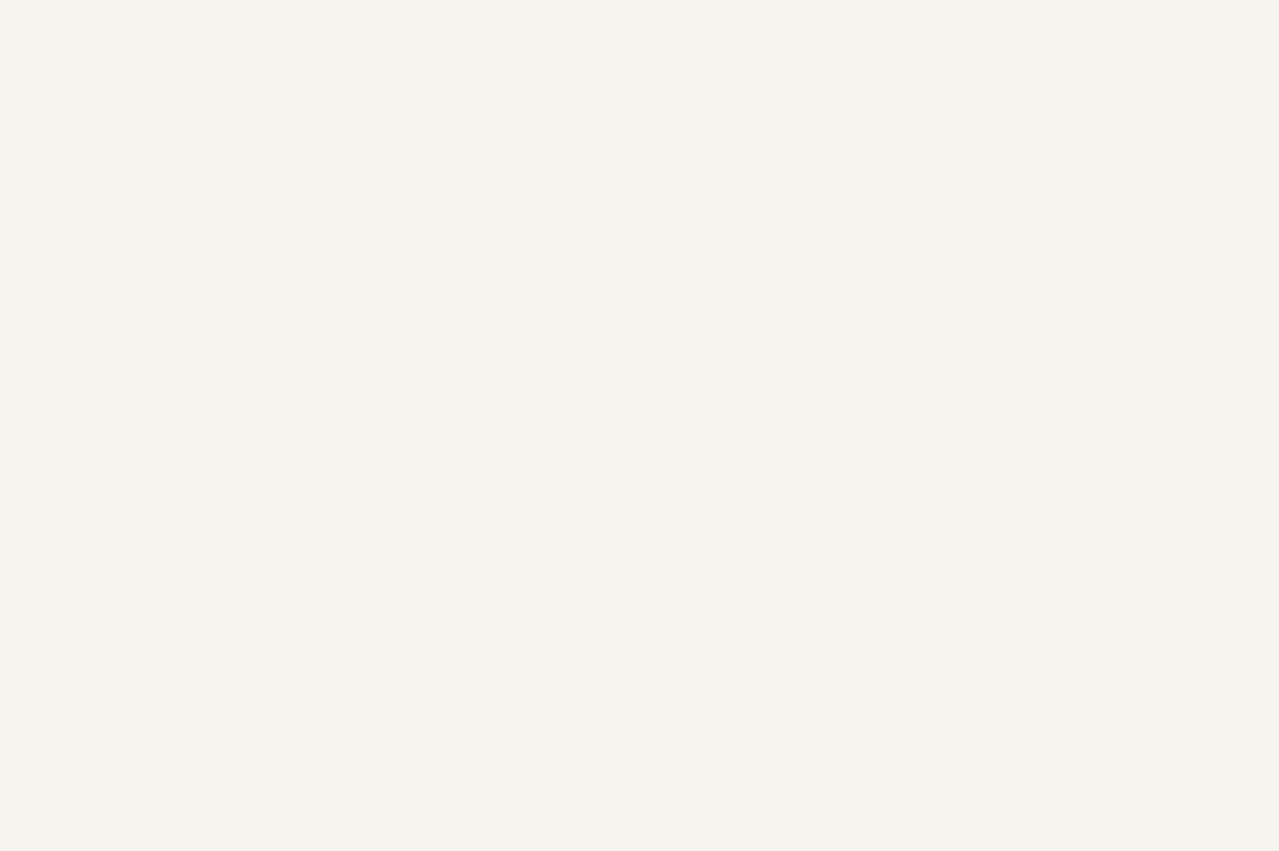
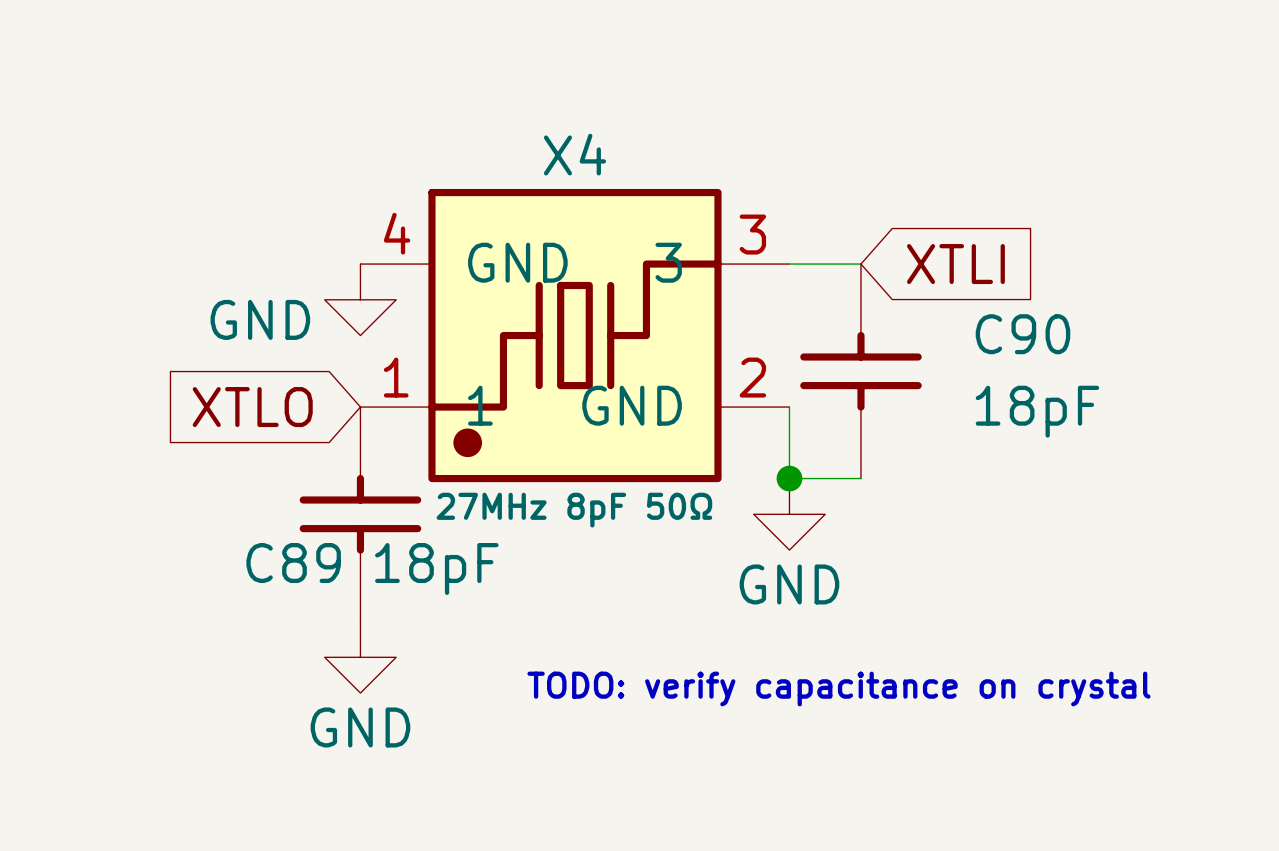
wire: none -> (789, 264) (860, 264)
global label: none -> XTLI (955, 264)
power symbol: none -> GND (360, 299)
X4: none -> 27MHz 8pF 50Ω (574, 335)
C90: none -> 18pF (860, 371)
global label: none -> XTLO (252, 407)
wire: none -> (789, 407) (789, 478) (860, 478)
junction: none -> (789, 478)
C89: none -> 18pF (360, 514)
power symbol: none -> GND (789, 514)
power symbol: none -> GND (360, 657)
text: none -> TODO: verify capacitance on crystal (838, 688)

